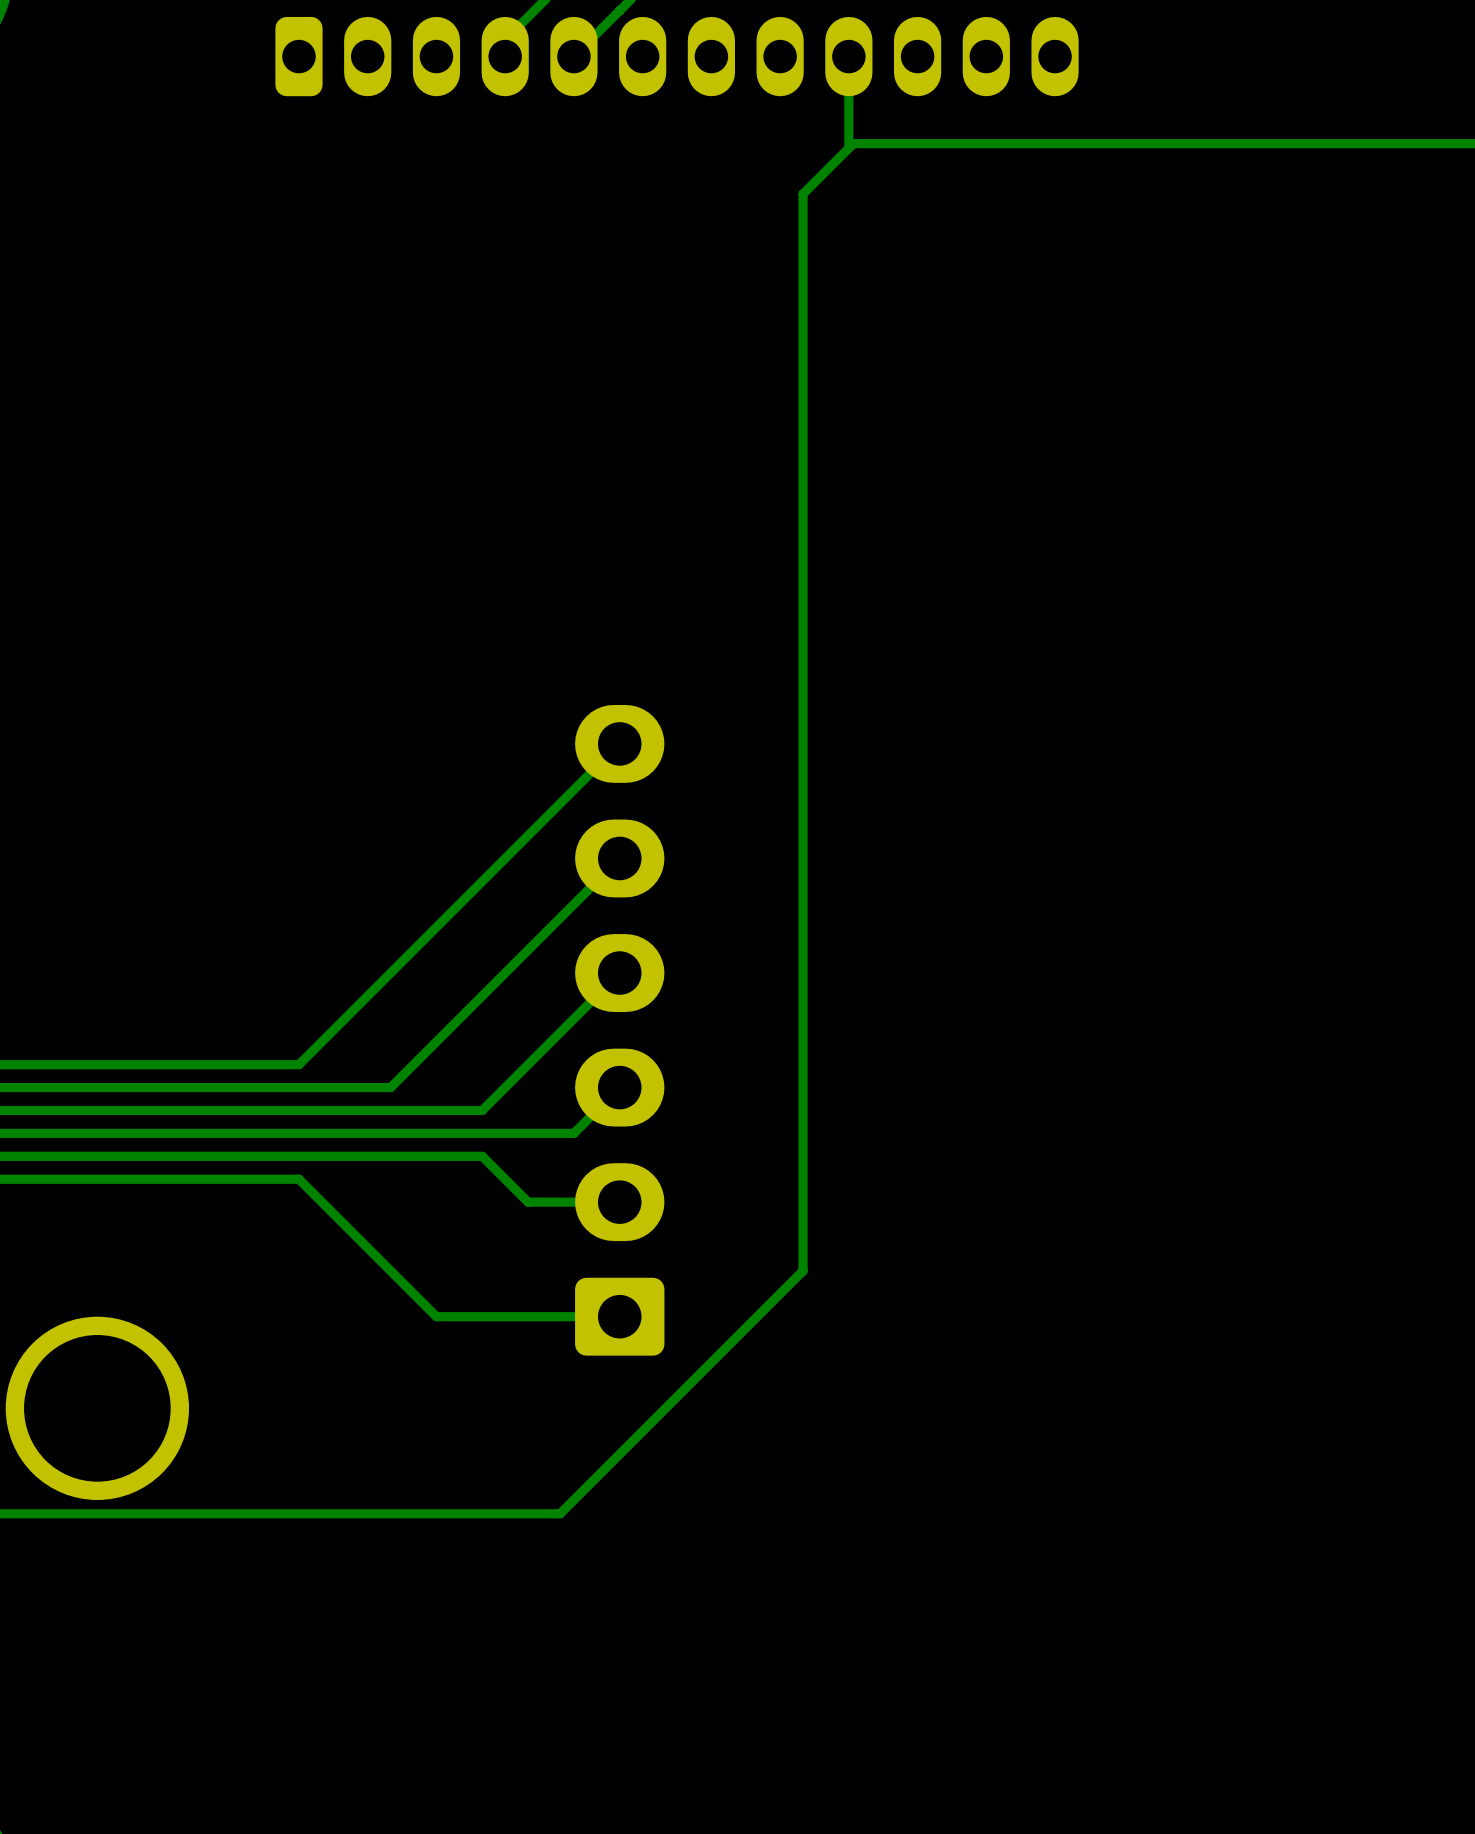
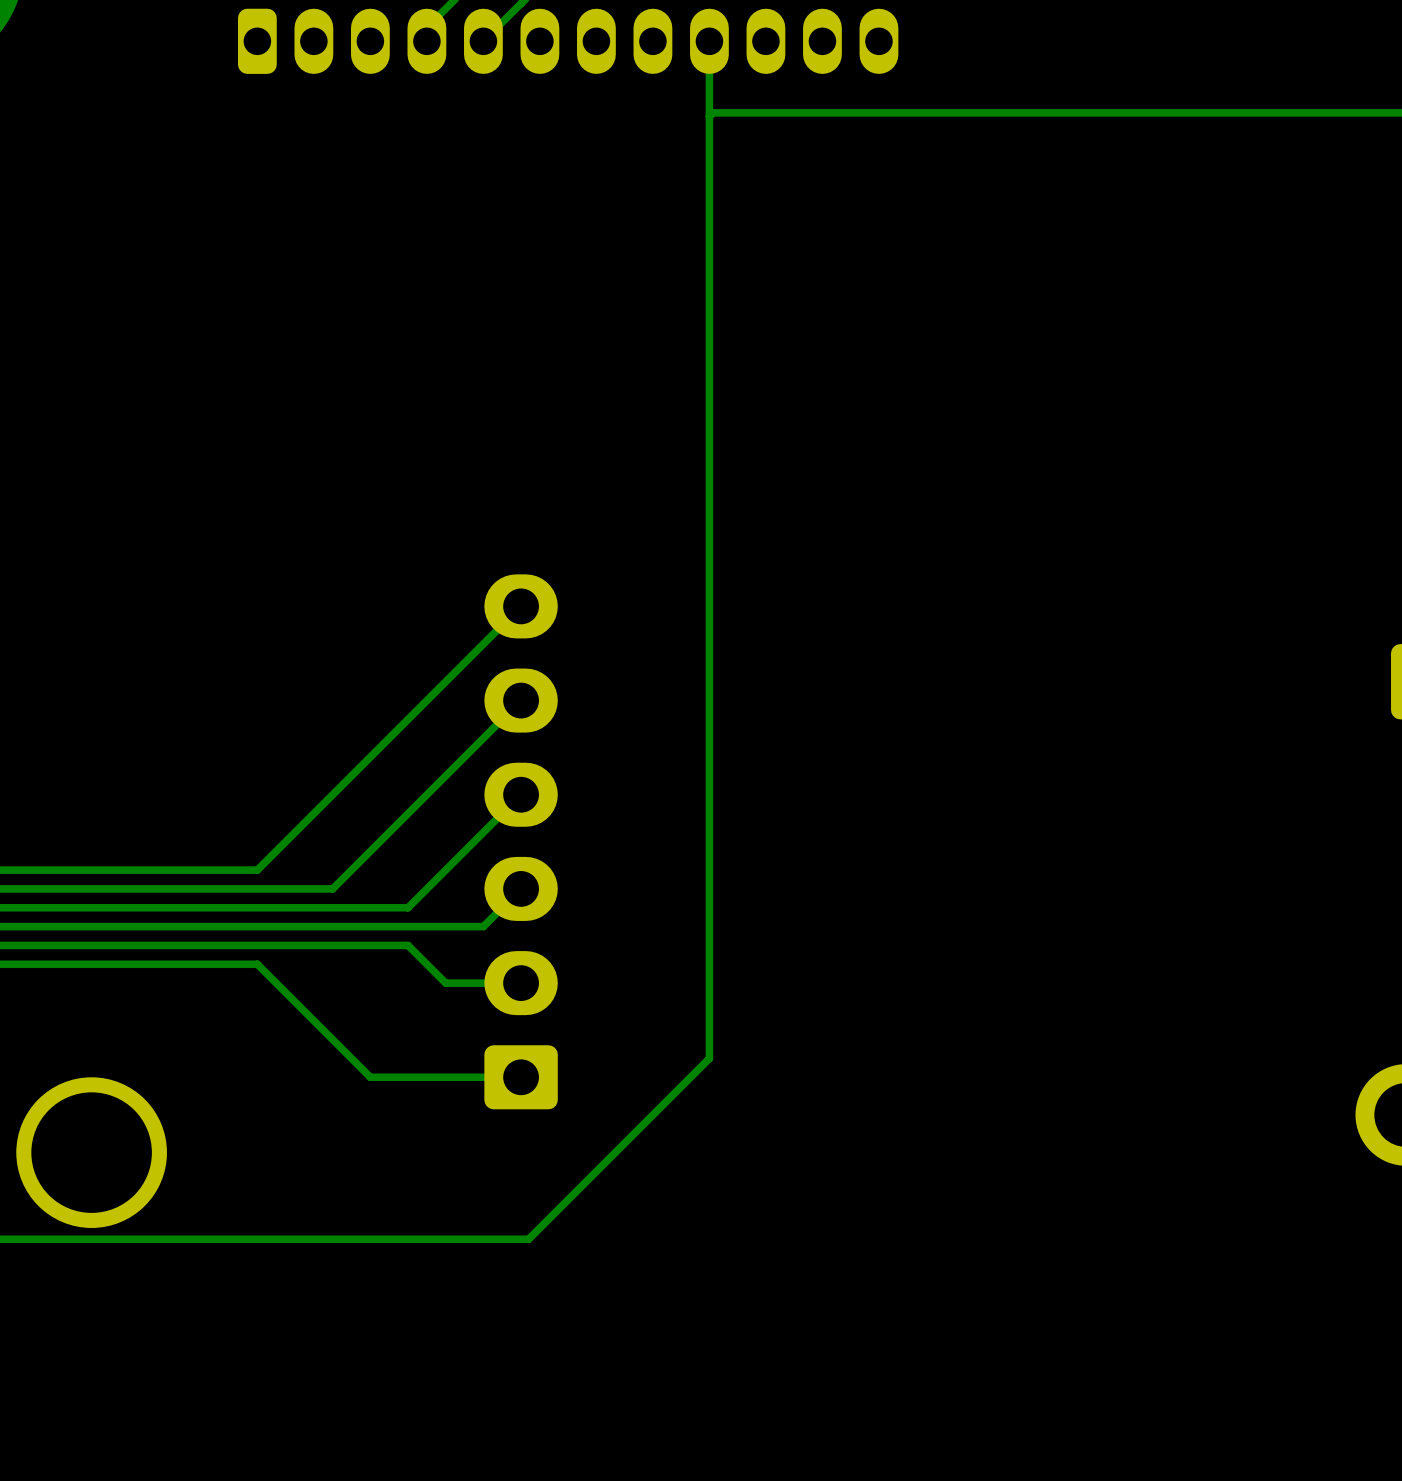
track: (848, 148) (803, 194) (803, 1270) (560, 1513) -> (709, 116) (709, 1058) (528, 1239) (472, 1239)

